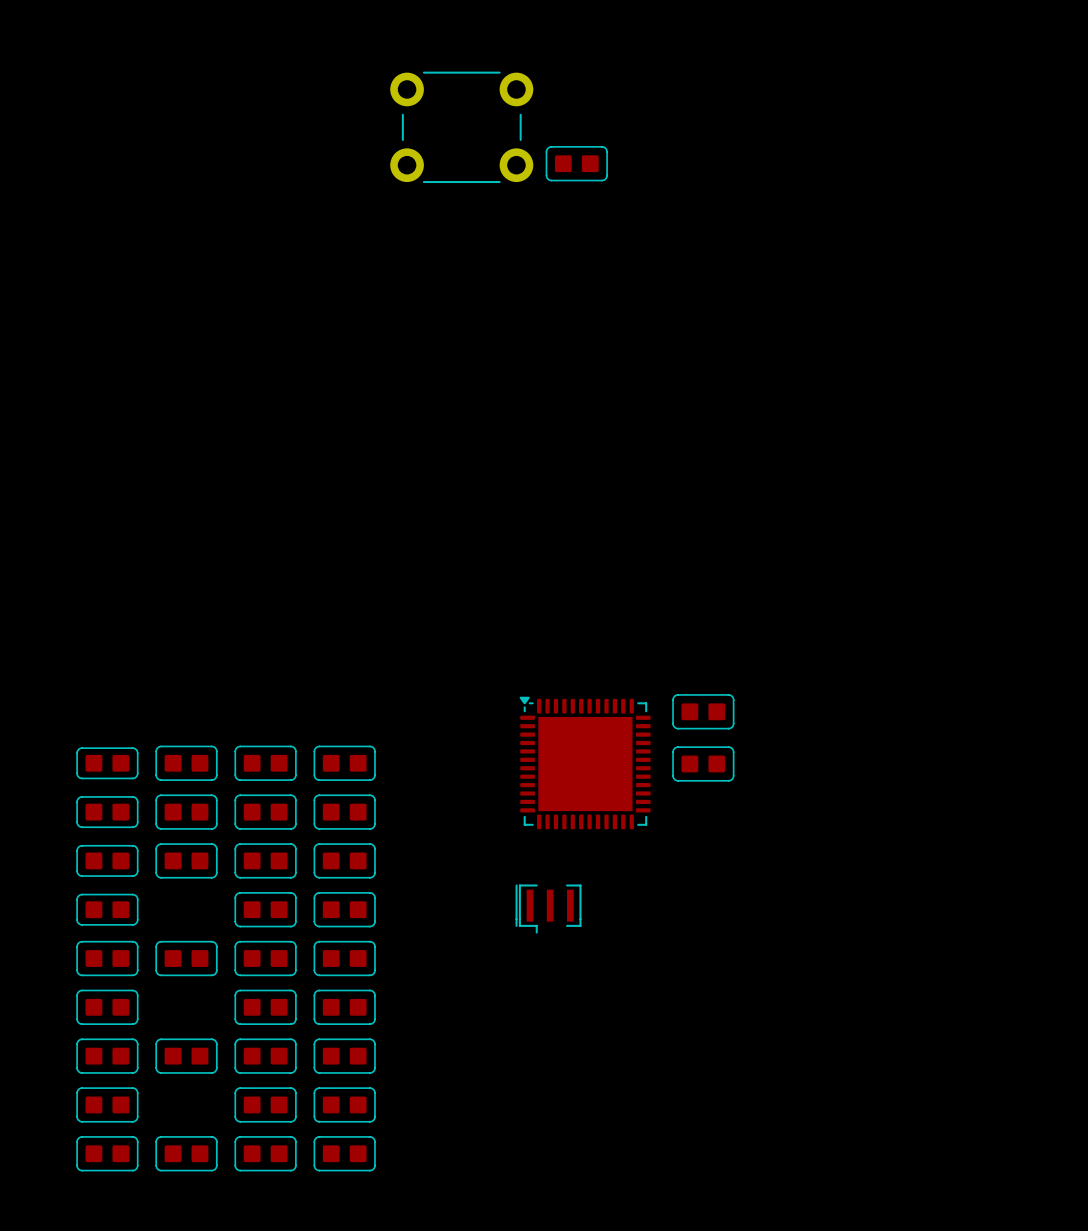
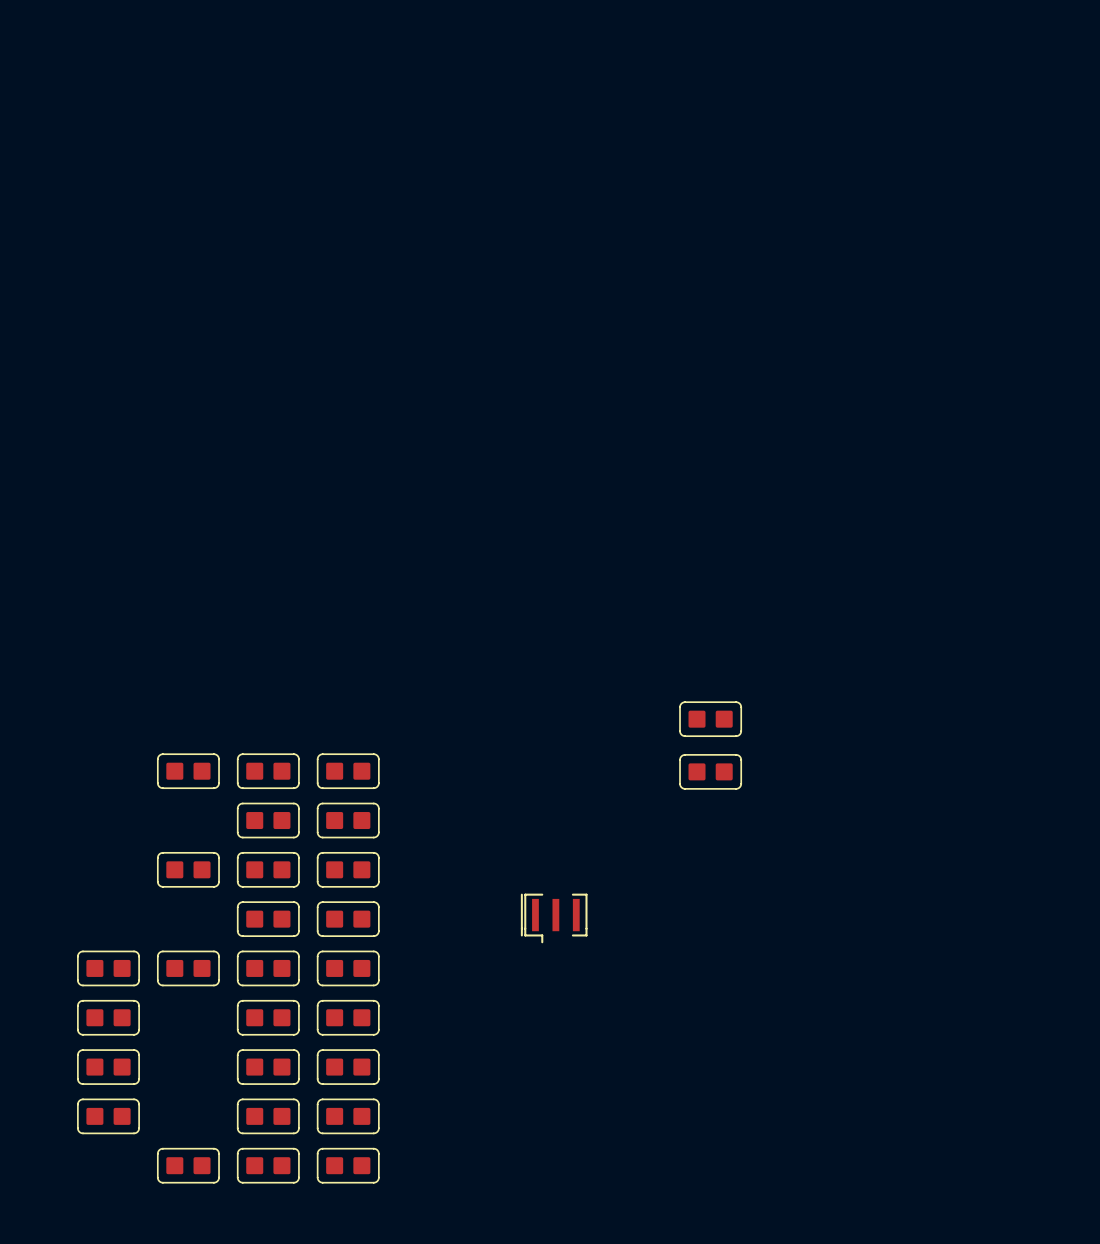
part: (461, 127) -> none
part: (576, 163) -> none
part: (107, 763) -> none
part: (585, 763) -> none
part: (107, 812) -> none
part: (186, 812) -> none
part: (107, 860) -> none
part: (107, 909) -> none
part: (186, 1056) -> none
part: (107, 1153) -> none

